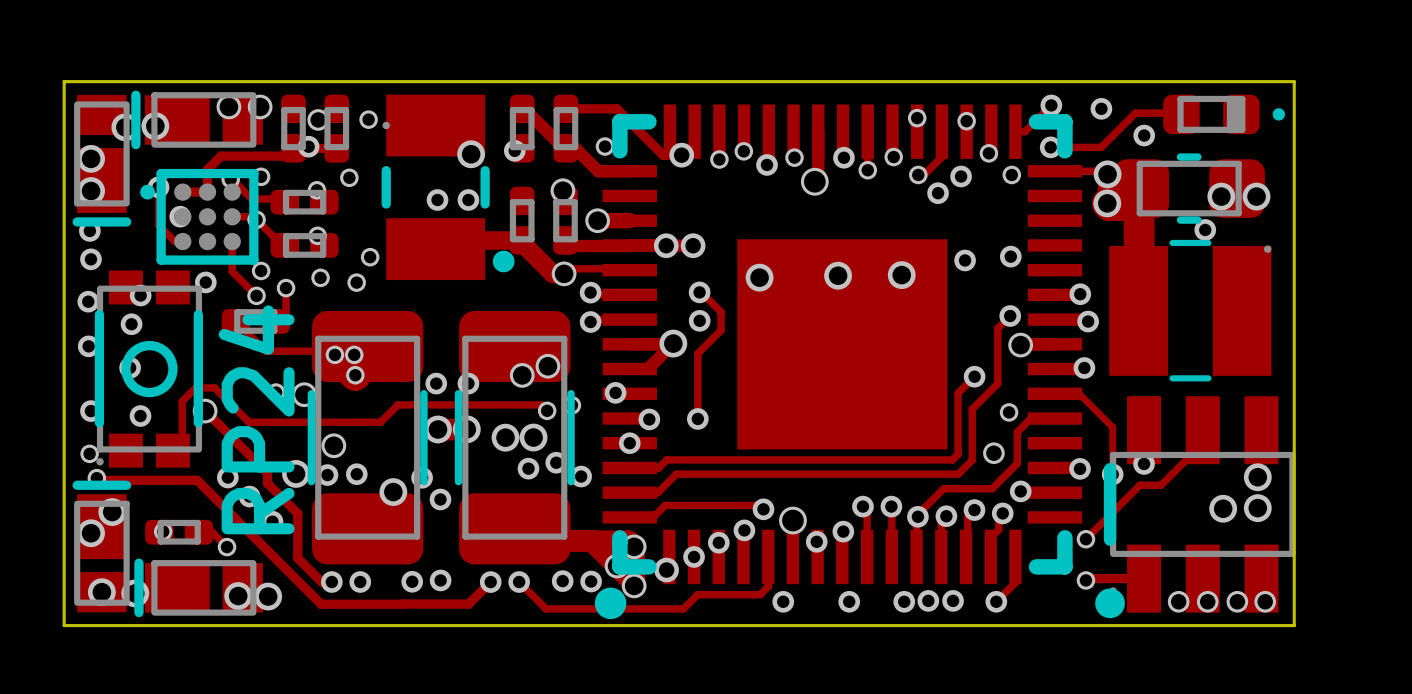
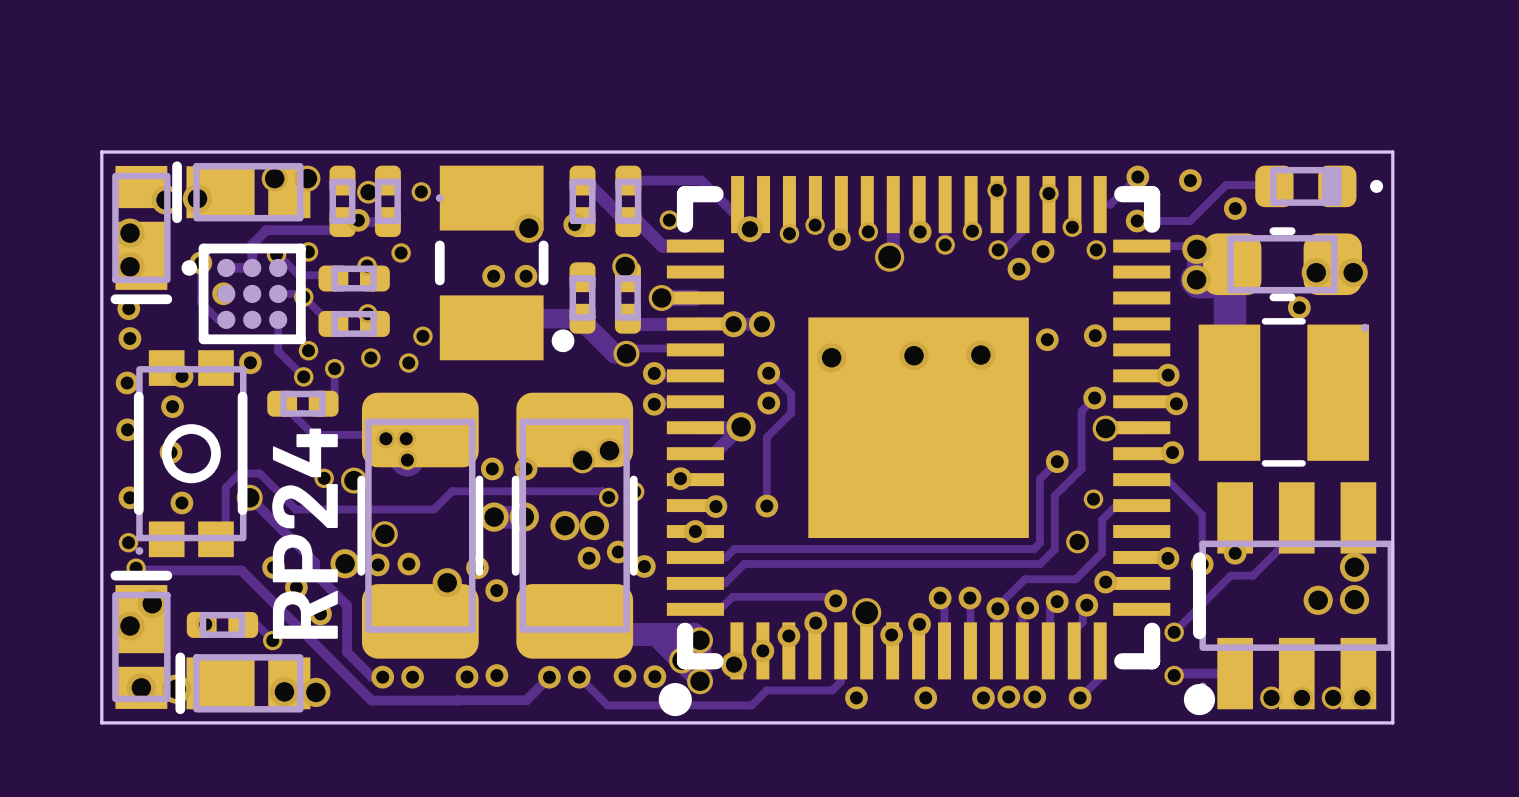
track: (616, 108) (663, 155) (681, 155) -> (681, 180) (701, 180) (737, 216)

